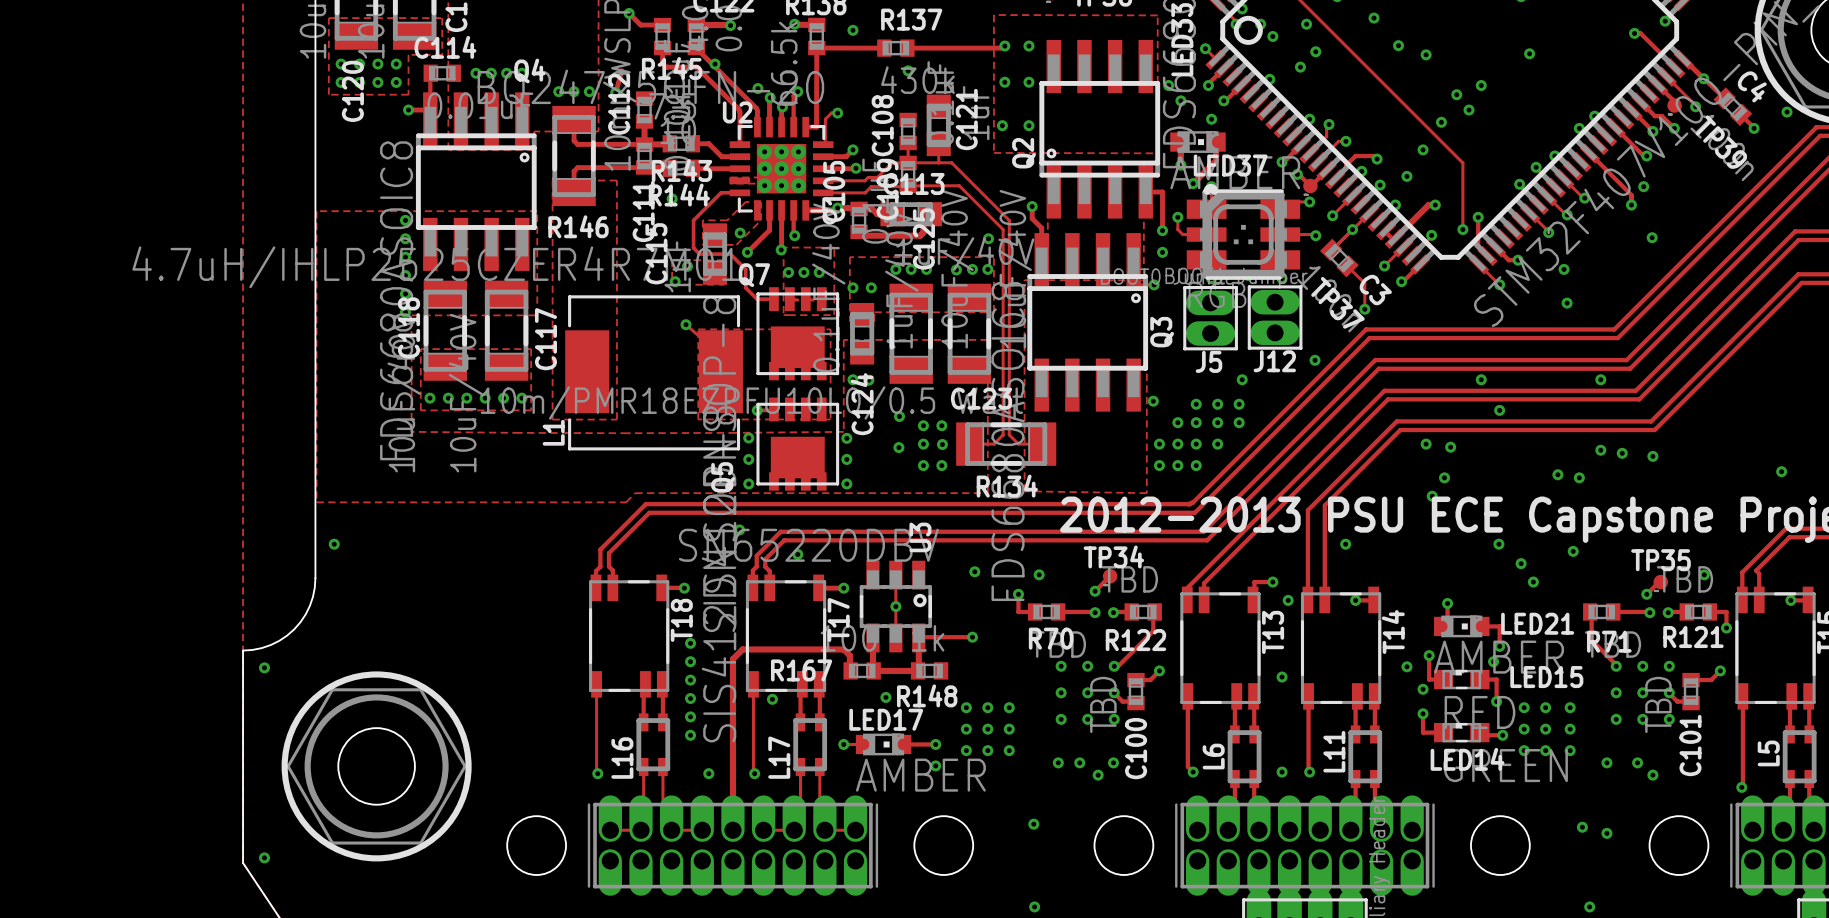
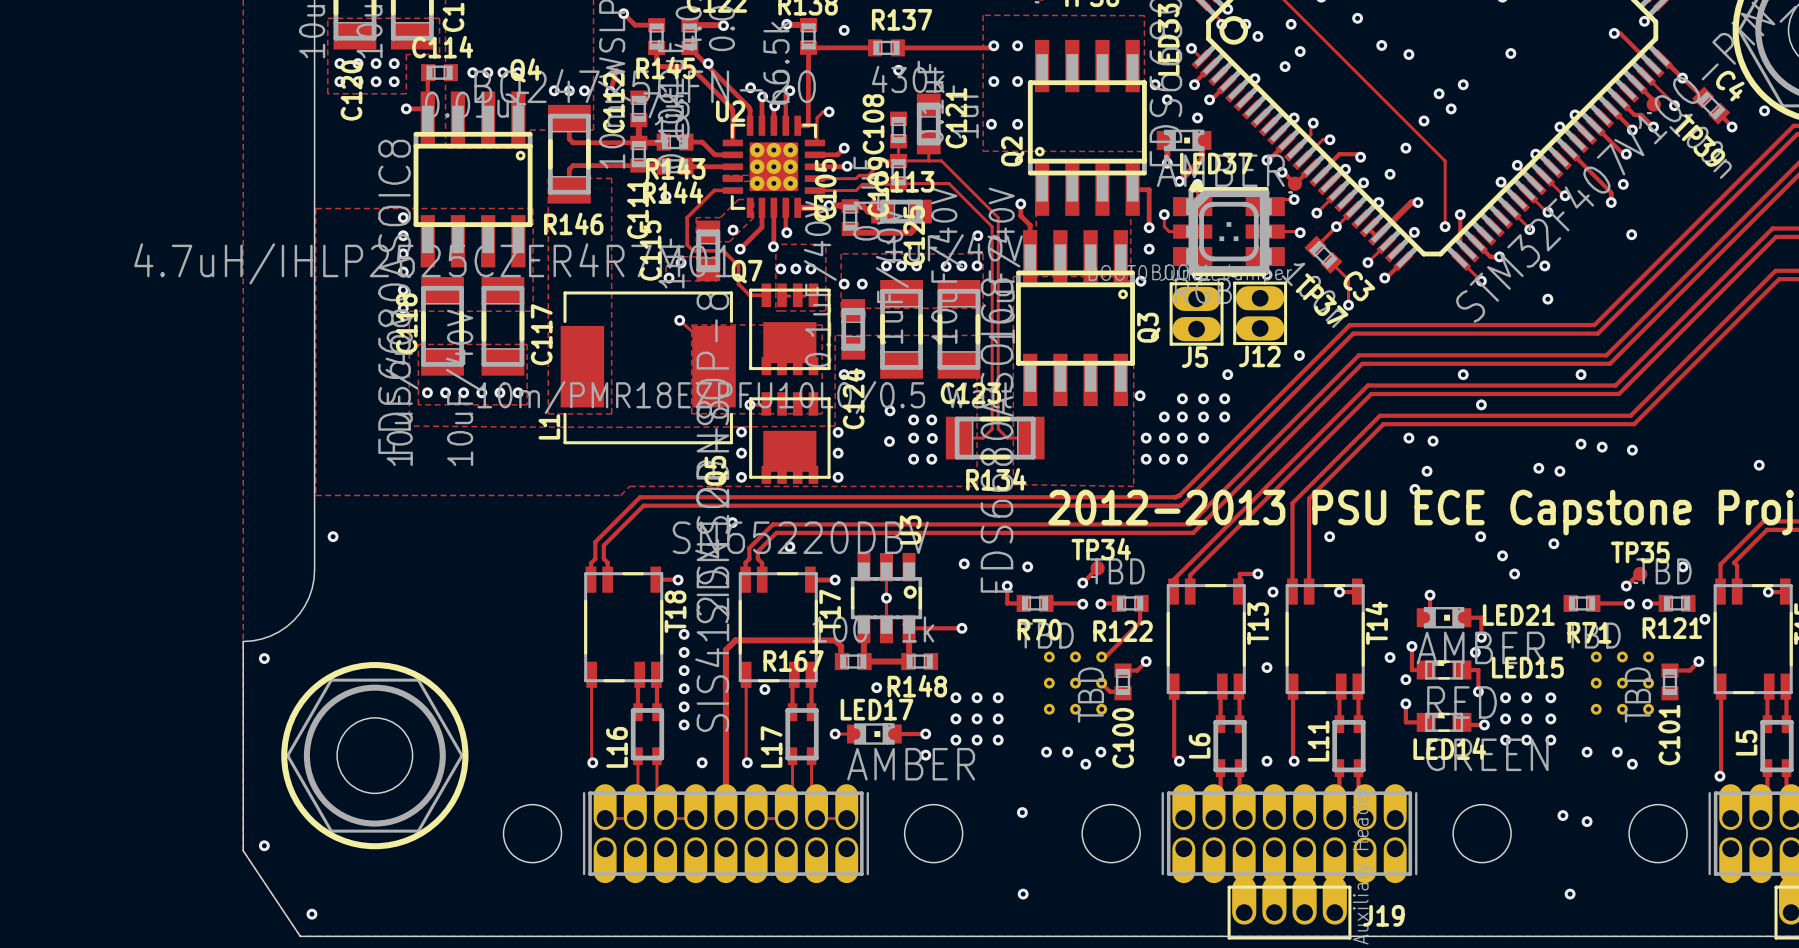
track: (1709, 611) (1726, 611) (1726, 628) -> none
track: (1591, 612) (1591, 640) (1616, 666) -> none
track: (1669, 692) (1677, 701) (1689, 701) -> none

